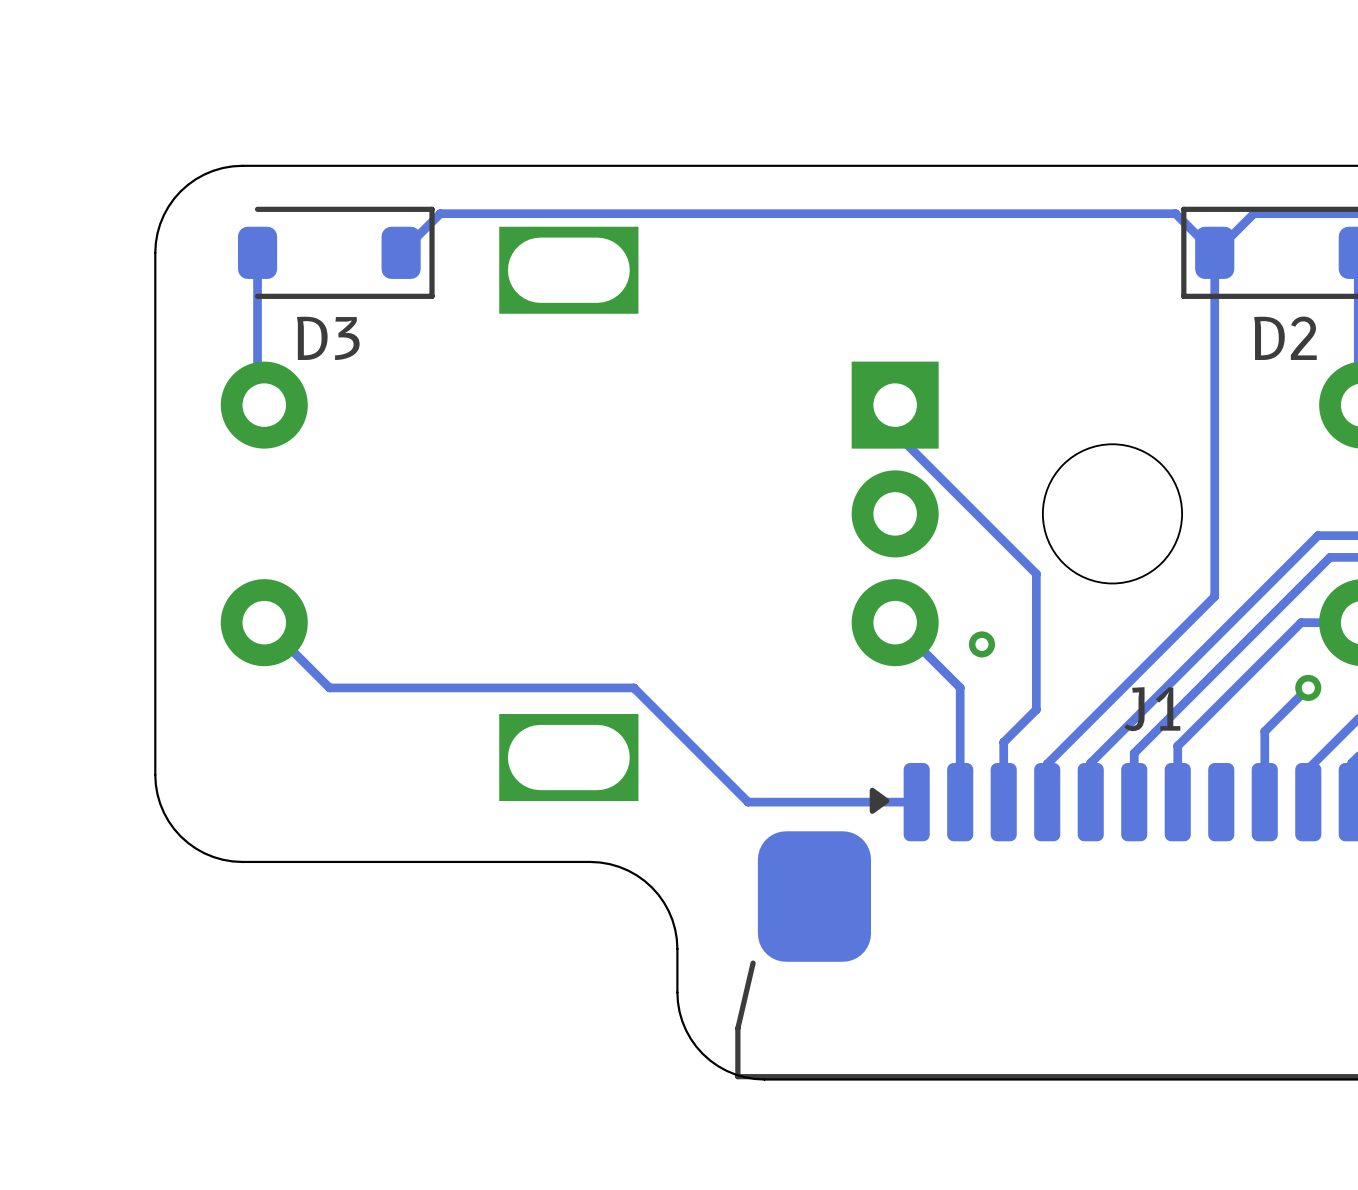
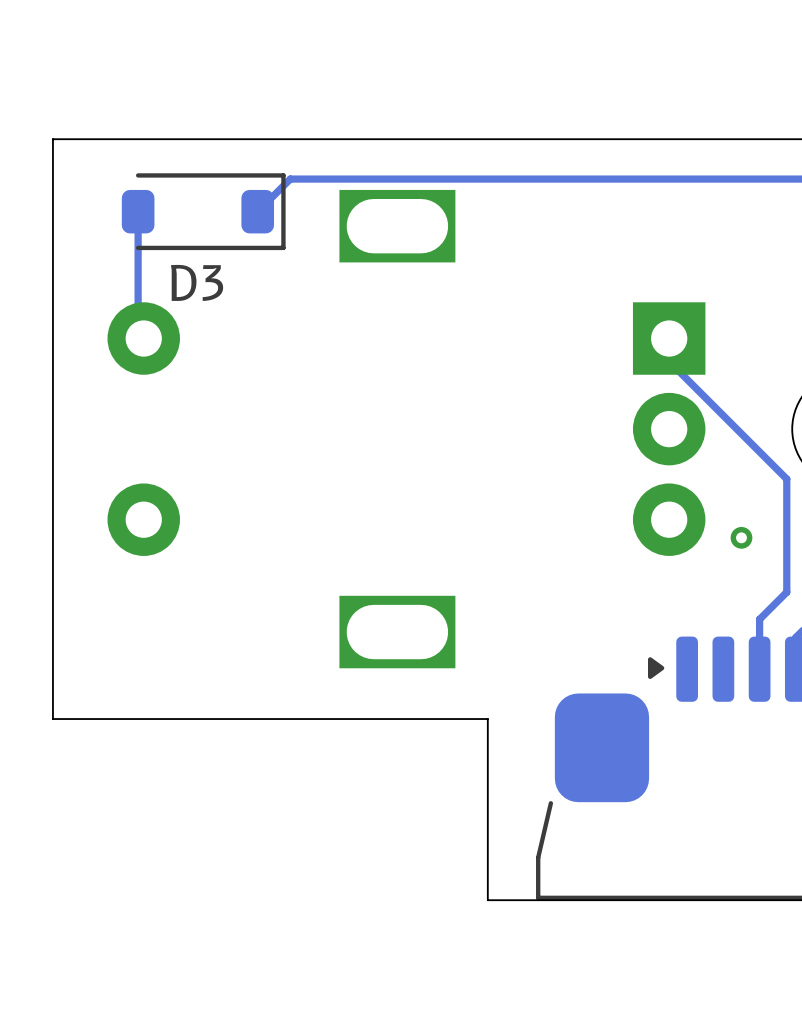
board edge: (242, 165) (213, 170) (196, 179) (180, 191) (168, 206) (160, 224) (155, 252) -> (125, 139) (52, 139) (52, 211)
track: (264, 622) (329, 687) (633, 687) (748, 802) (916, 802) -> none
track: (895, 622) (960, 687) (960, 802) -> none
board edge: (155, 774) (160, 803) (168, 821) (180, 836) (196, 848) (213, 857) (242, 861) -> (52, 646) (52, 719) (125, 719)
board edge: (590, 861) (609, 864) (628, 870) (651, 887) (664, 902) (672, 920) (677, 948) -> (415, 719) (487, 719) (487, 791)
board edge: (677, 992) (682, 1021) (690, 1038) (702, 1054) (726, 1070) (745, 1077) (764, 1079) -> (487, 827) (487, 900) (560, 900)

